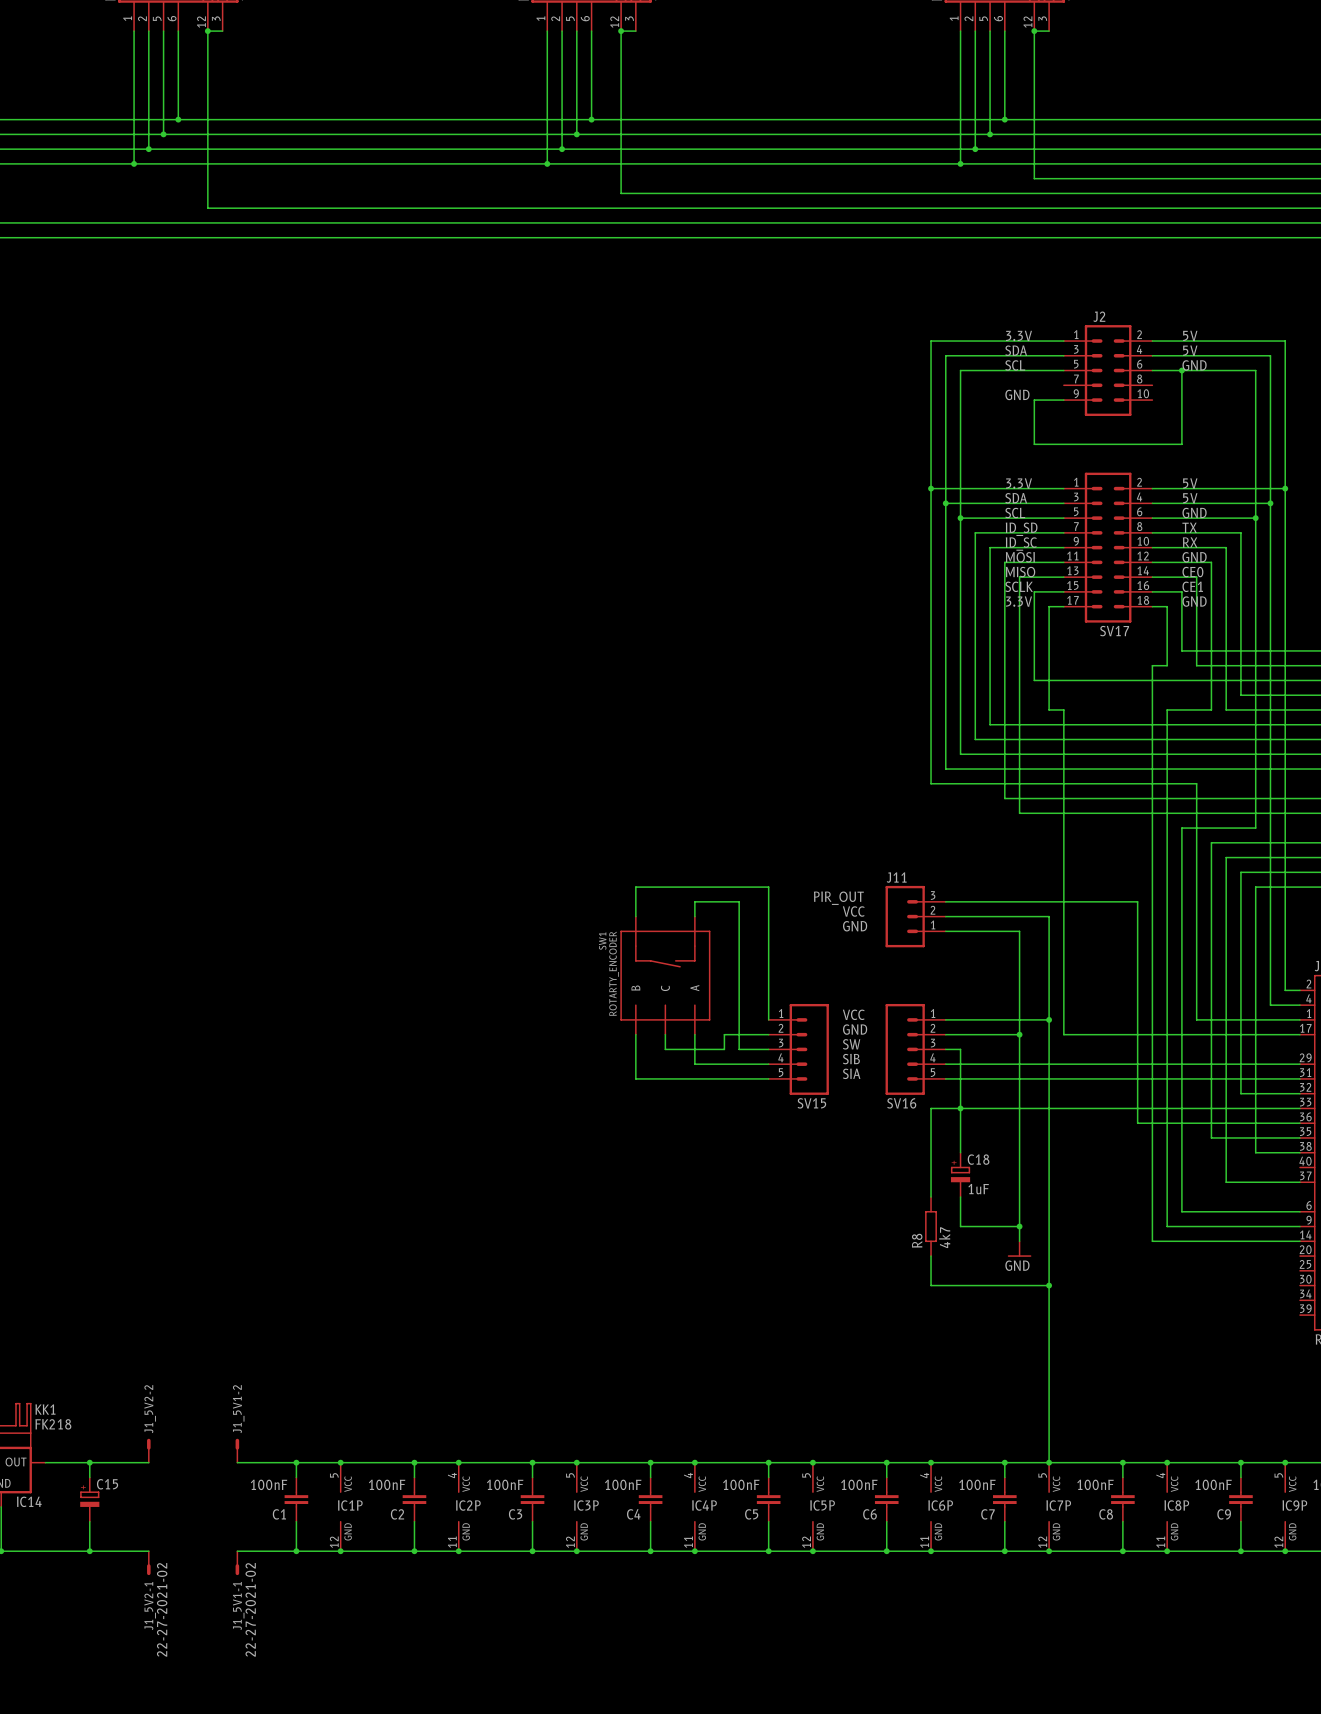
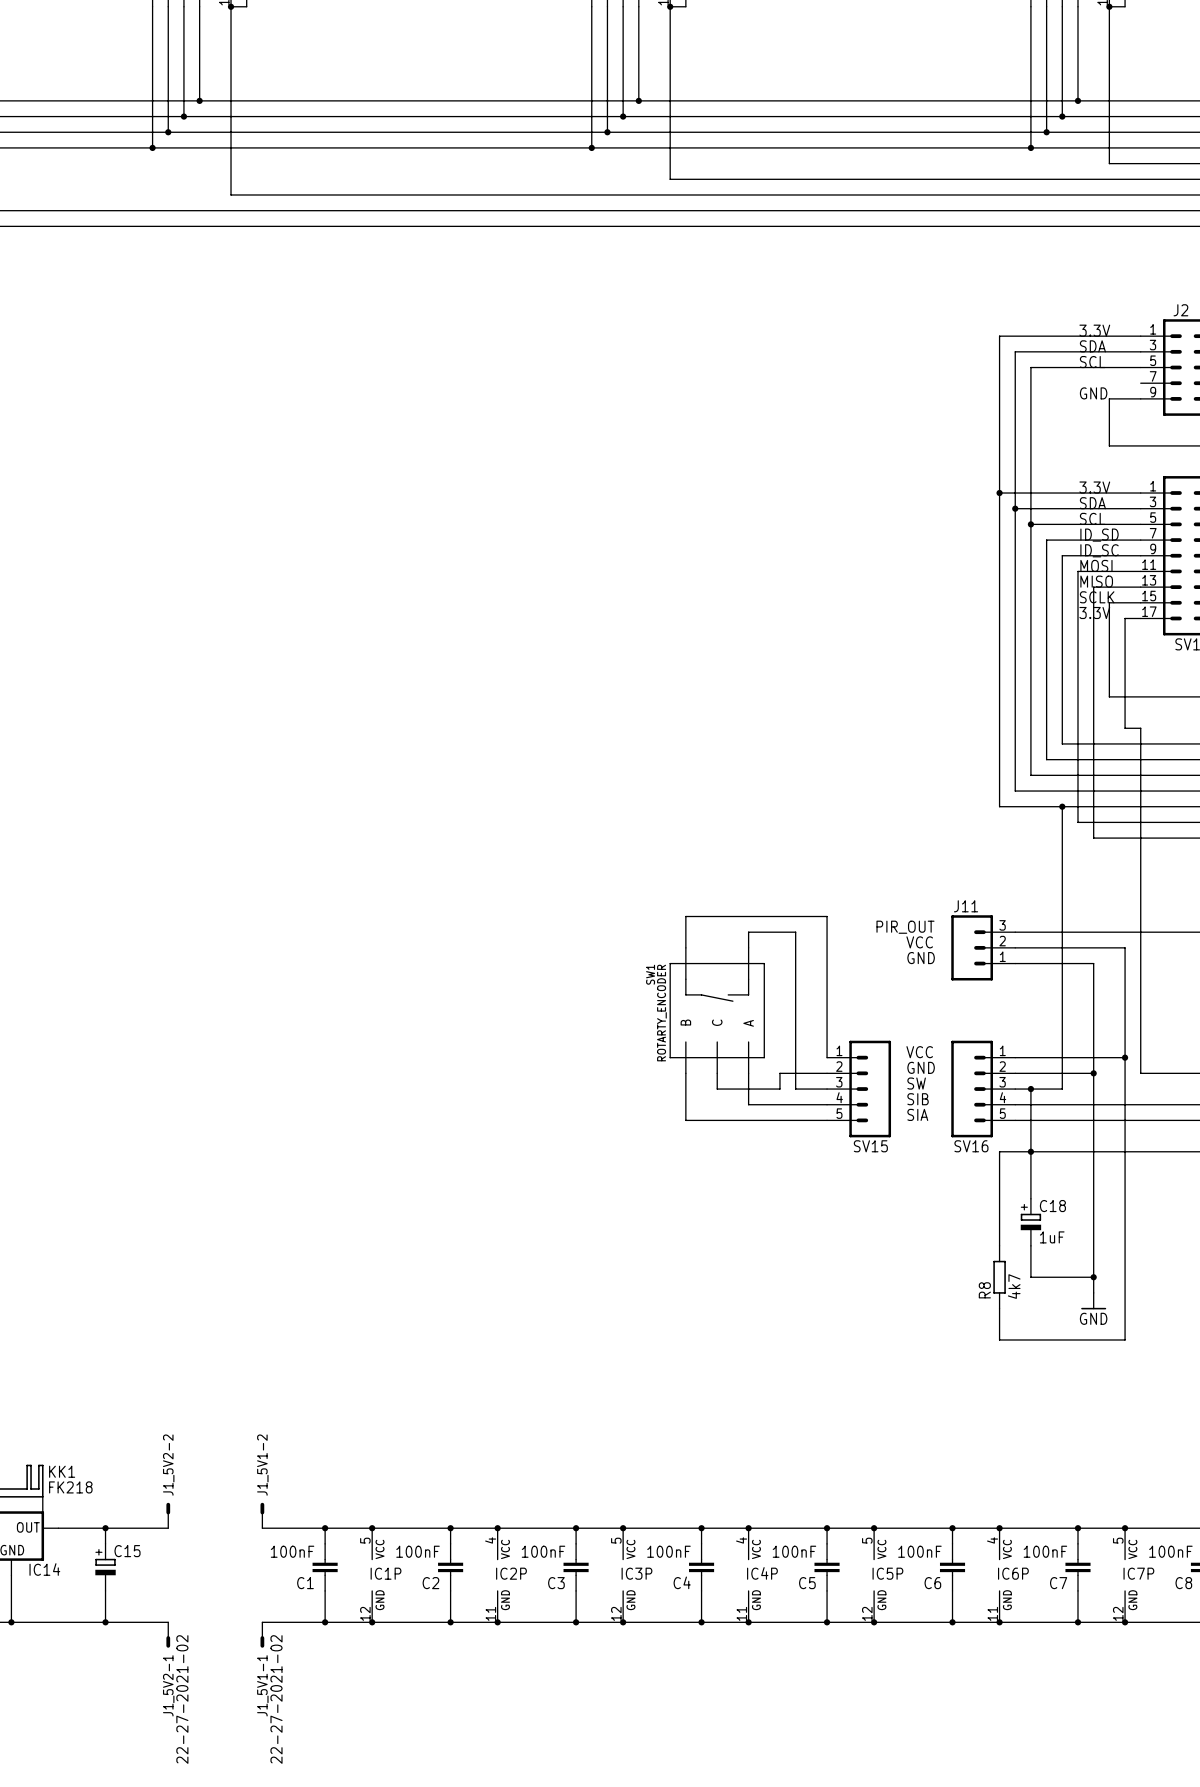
wire: none -> (1062, 806) (1062, 1089) (1030, 1089)
junction: none -> (1062, 806)
junction: none -> (1030, 1089)
wire: (1049, 1285) (1049, 1462) -> none
junction: (1049, 1285) -> none

